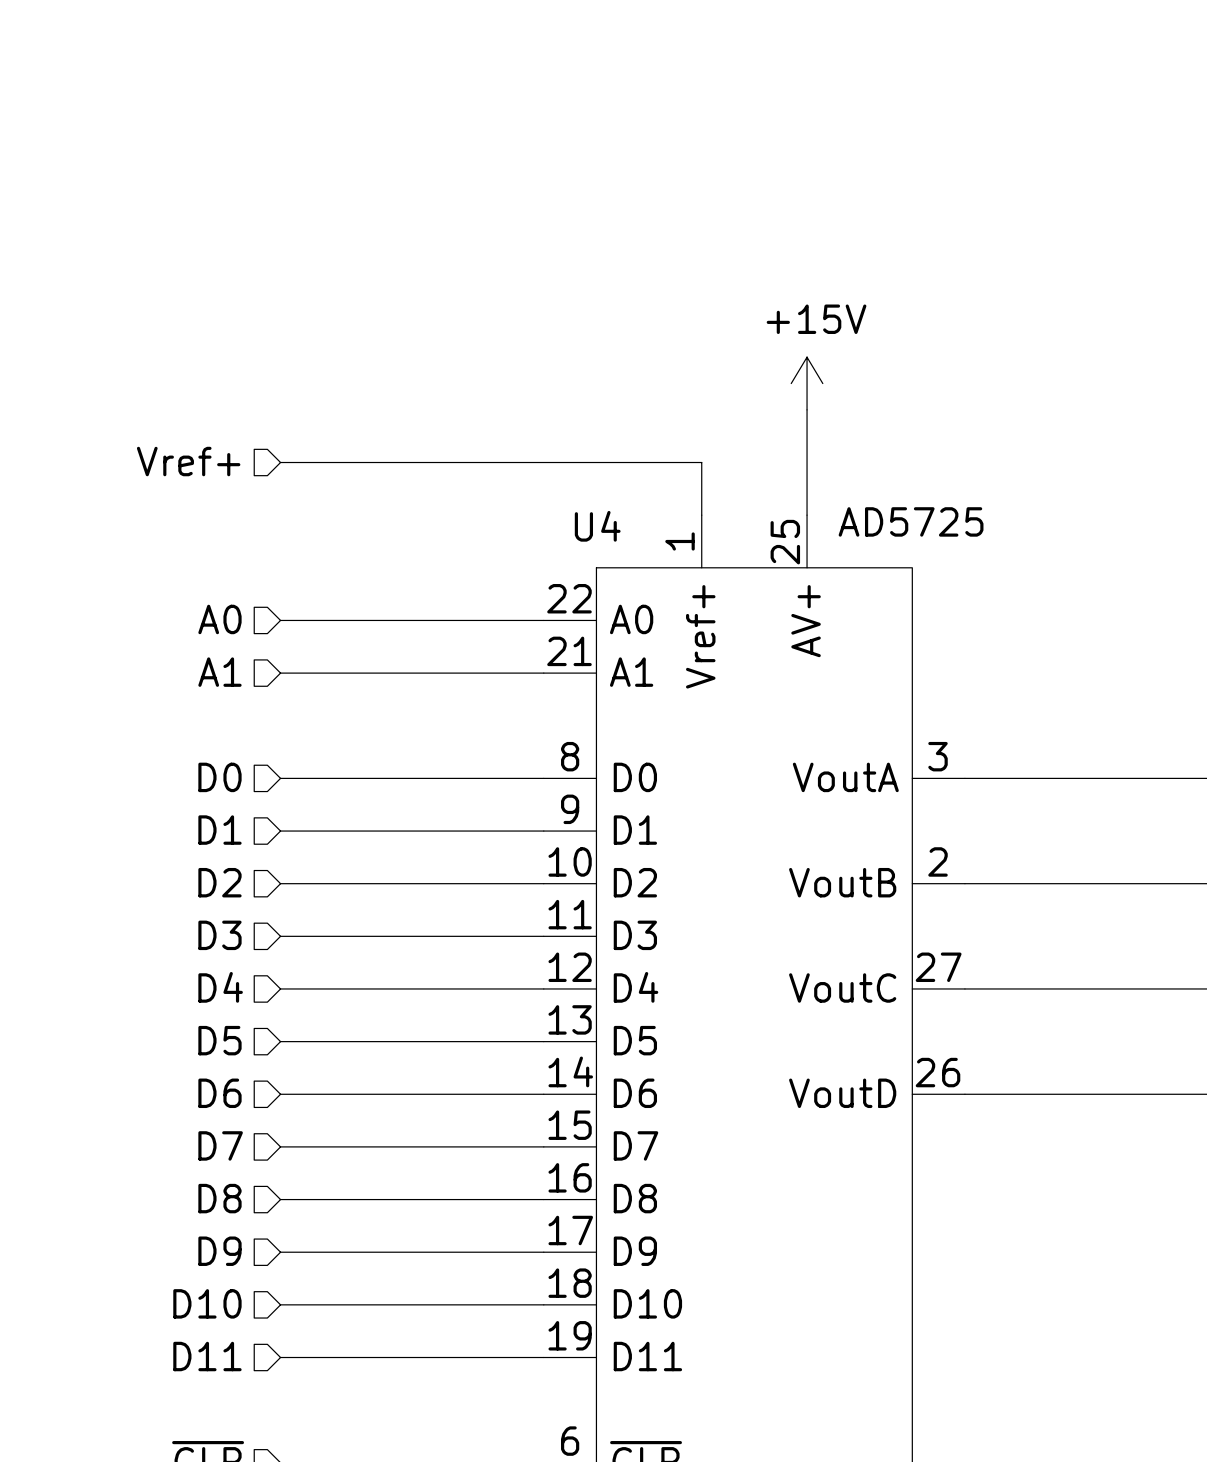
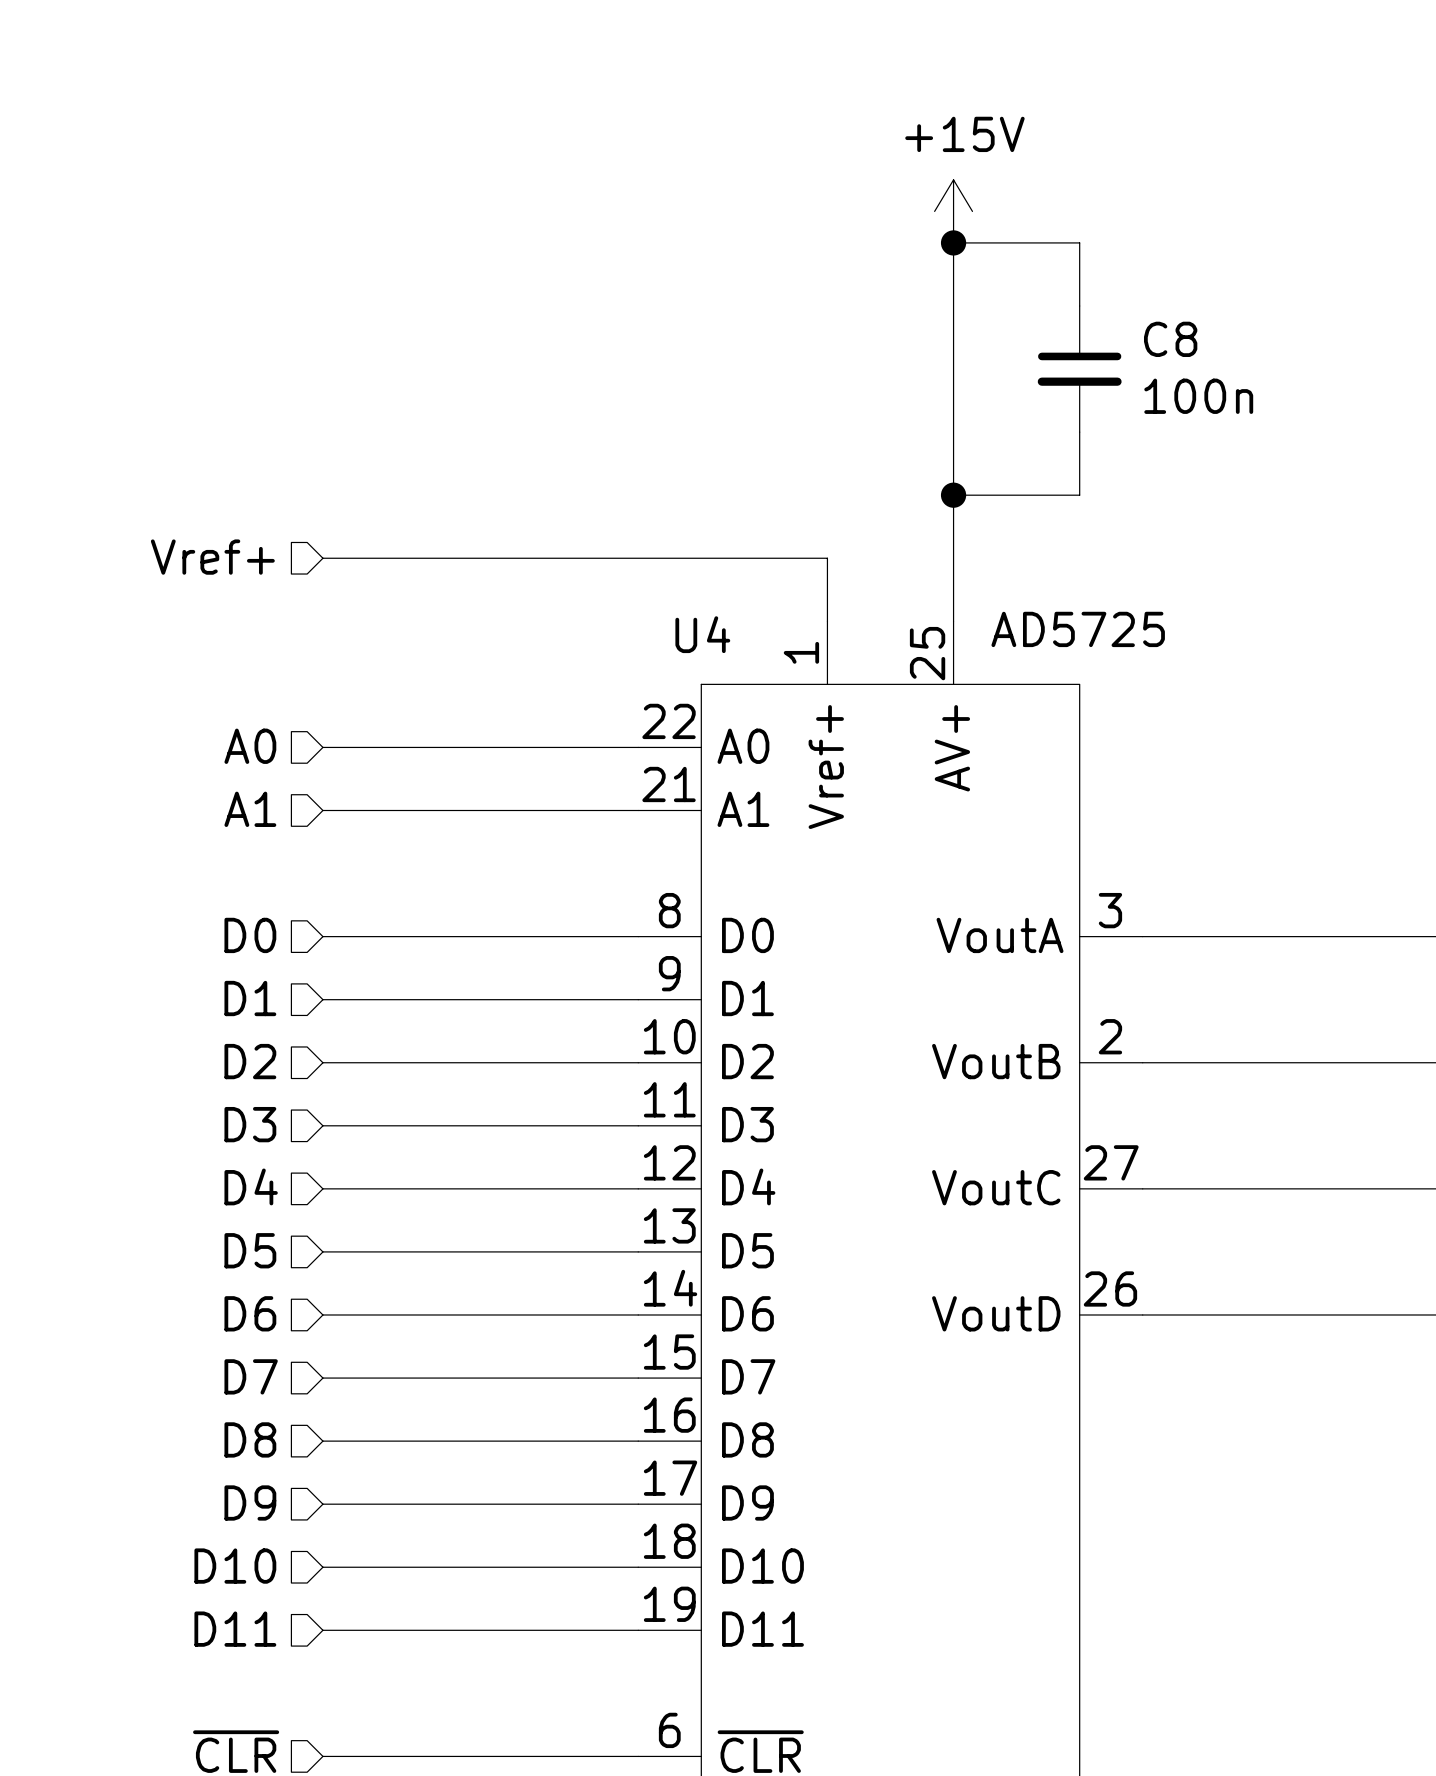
junction: none -> (953, 242)
wire: none -> (1079, 306) (1079, 242) (953, 242) (953, 495) (1079, 495) (1079, 432)
C8: none -> 100n (1079, 369)
power symbol position: +15V (807, 383) -> +15V (953, 211)
junction: none -> (953, 495)

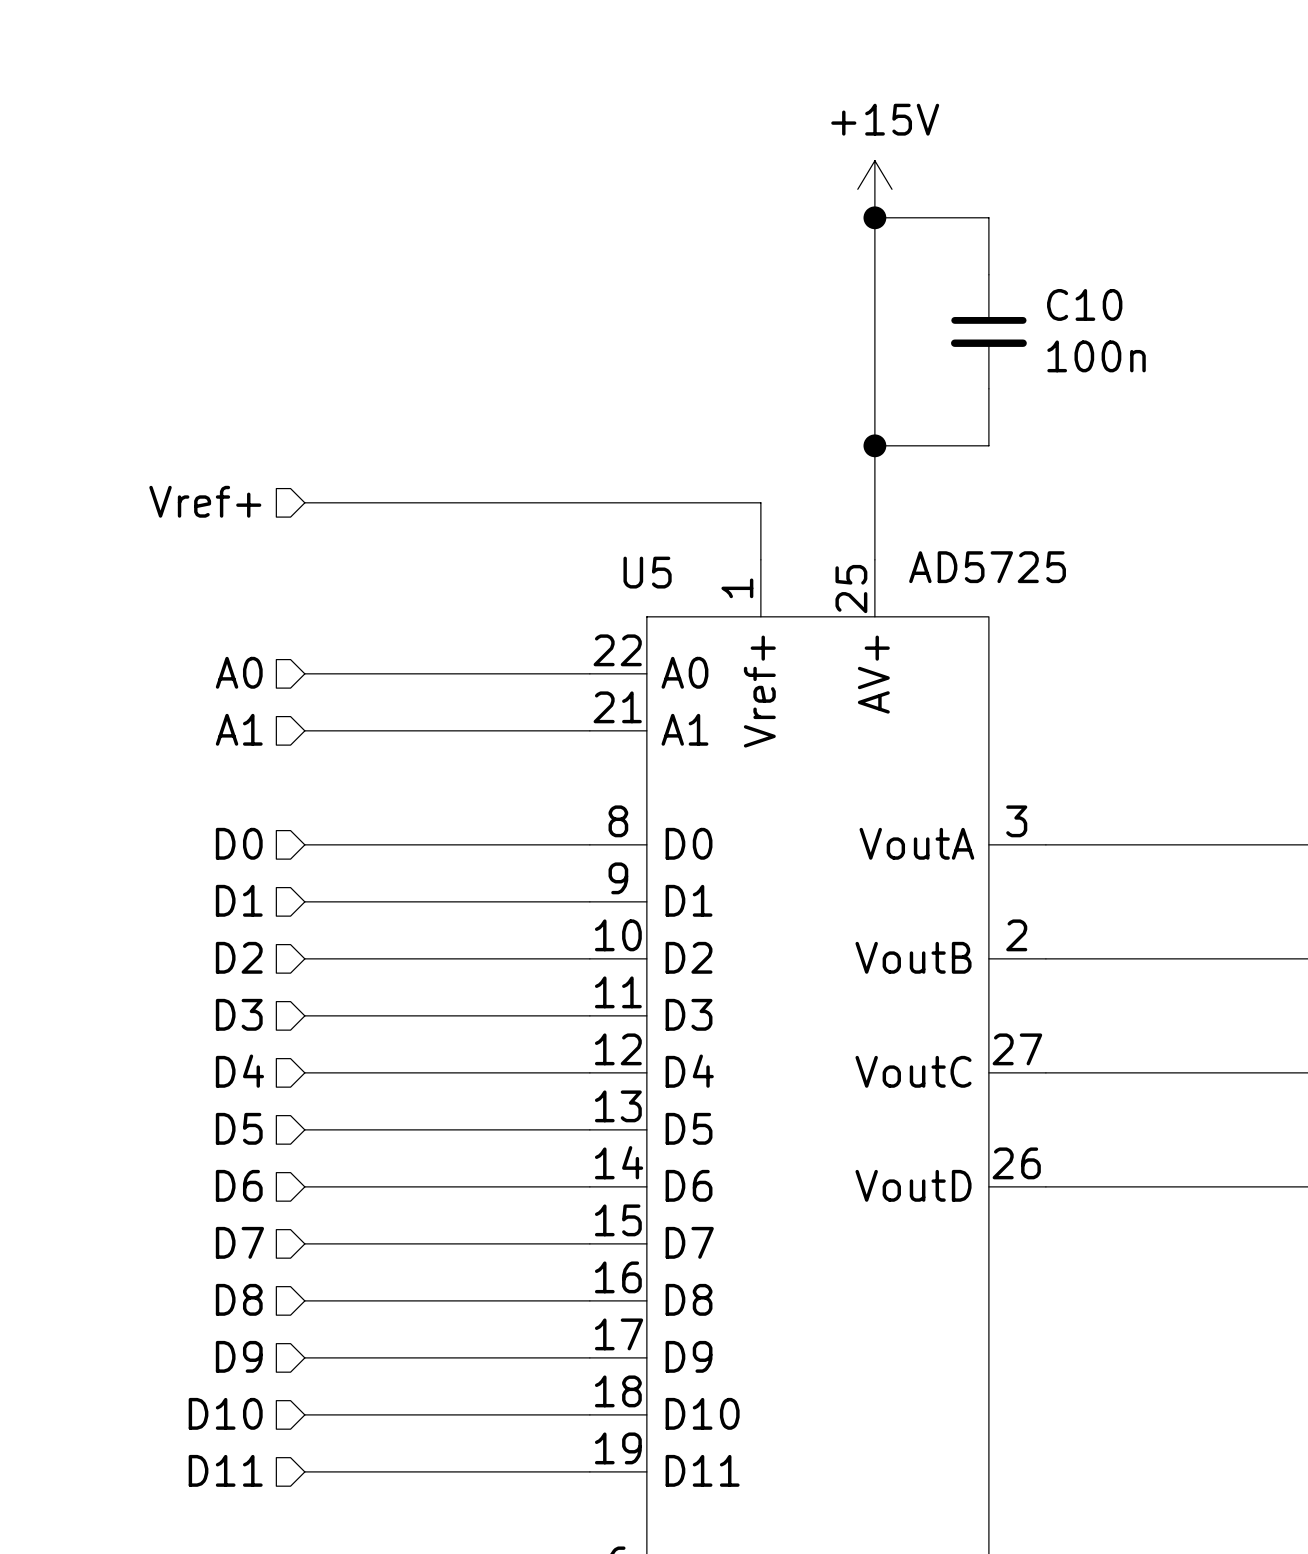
C8 name: C8 (1170, 339) -> C10 (1084, 304)
U4 name: U4 (702, 634) -> U5 (647, 572)

